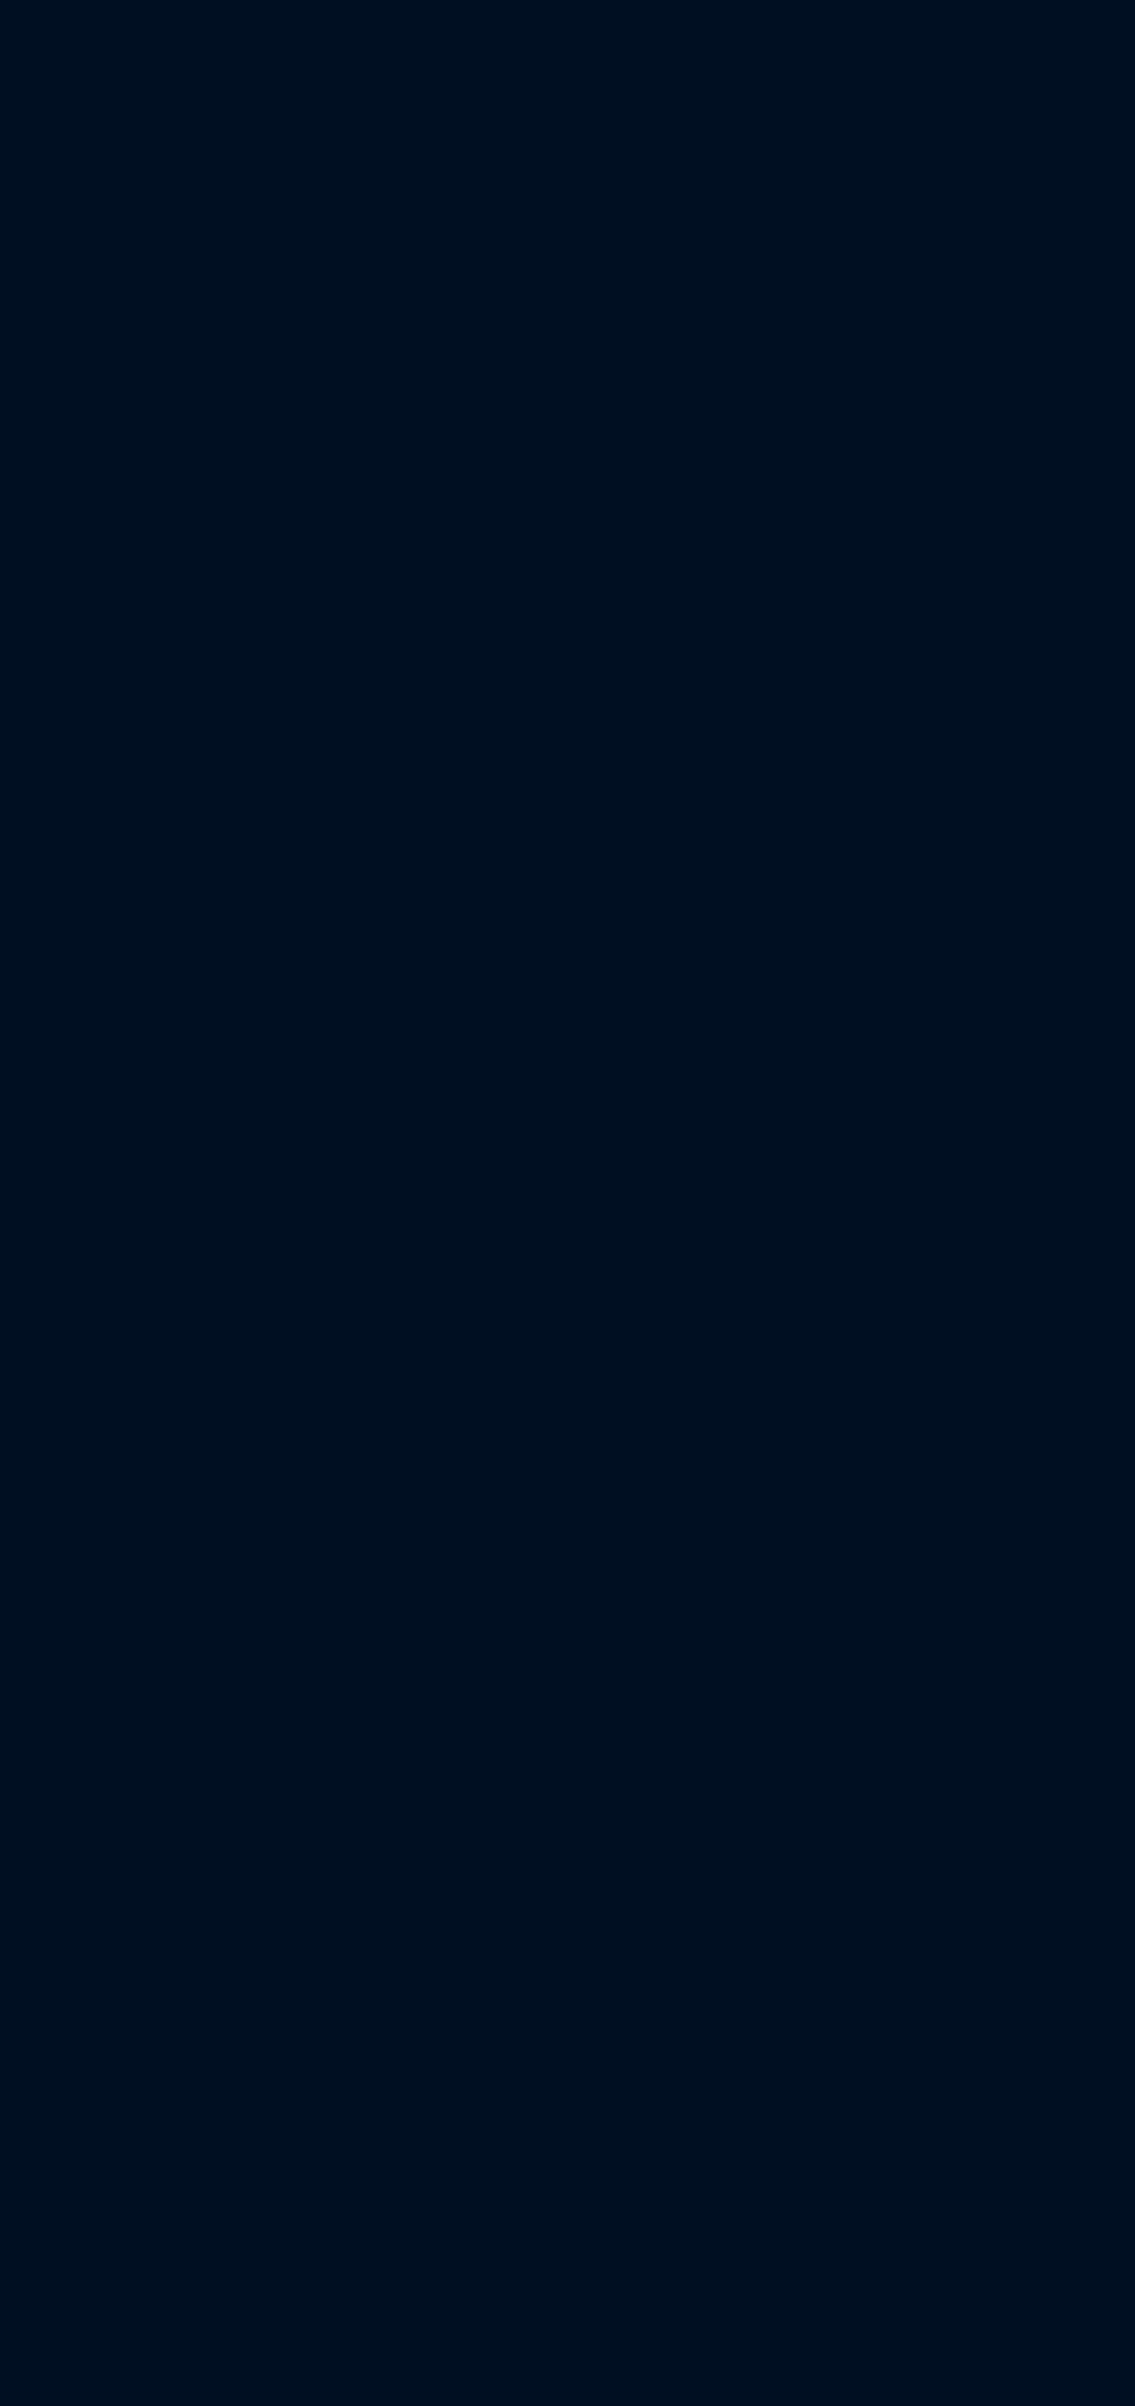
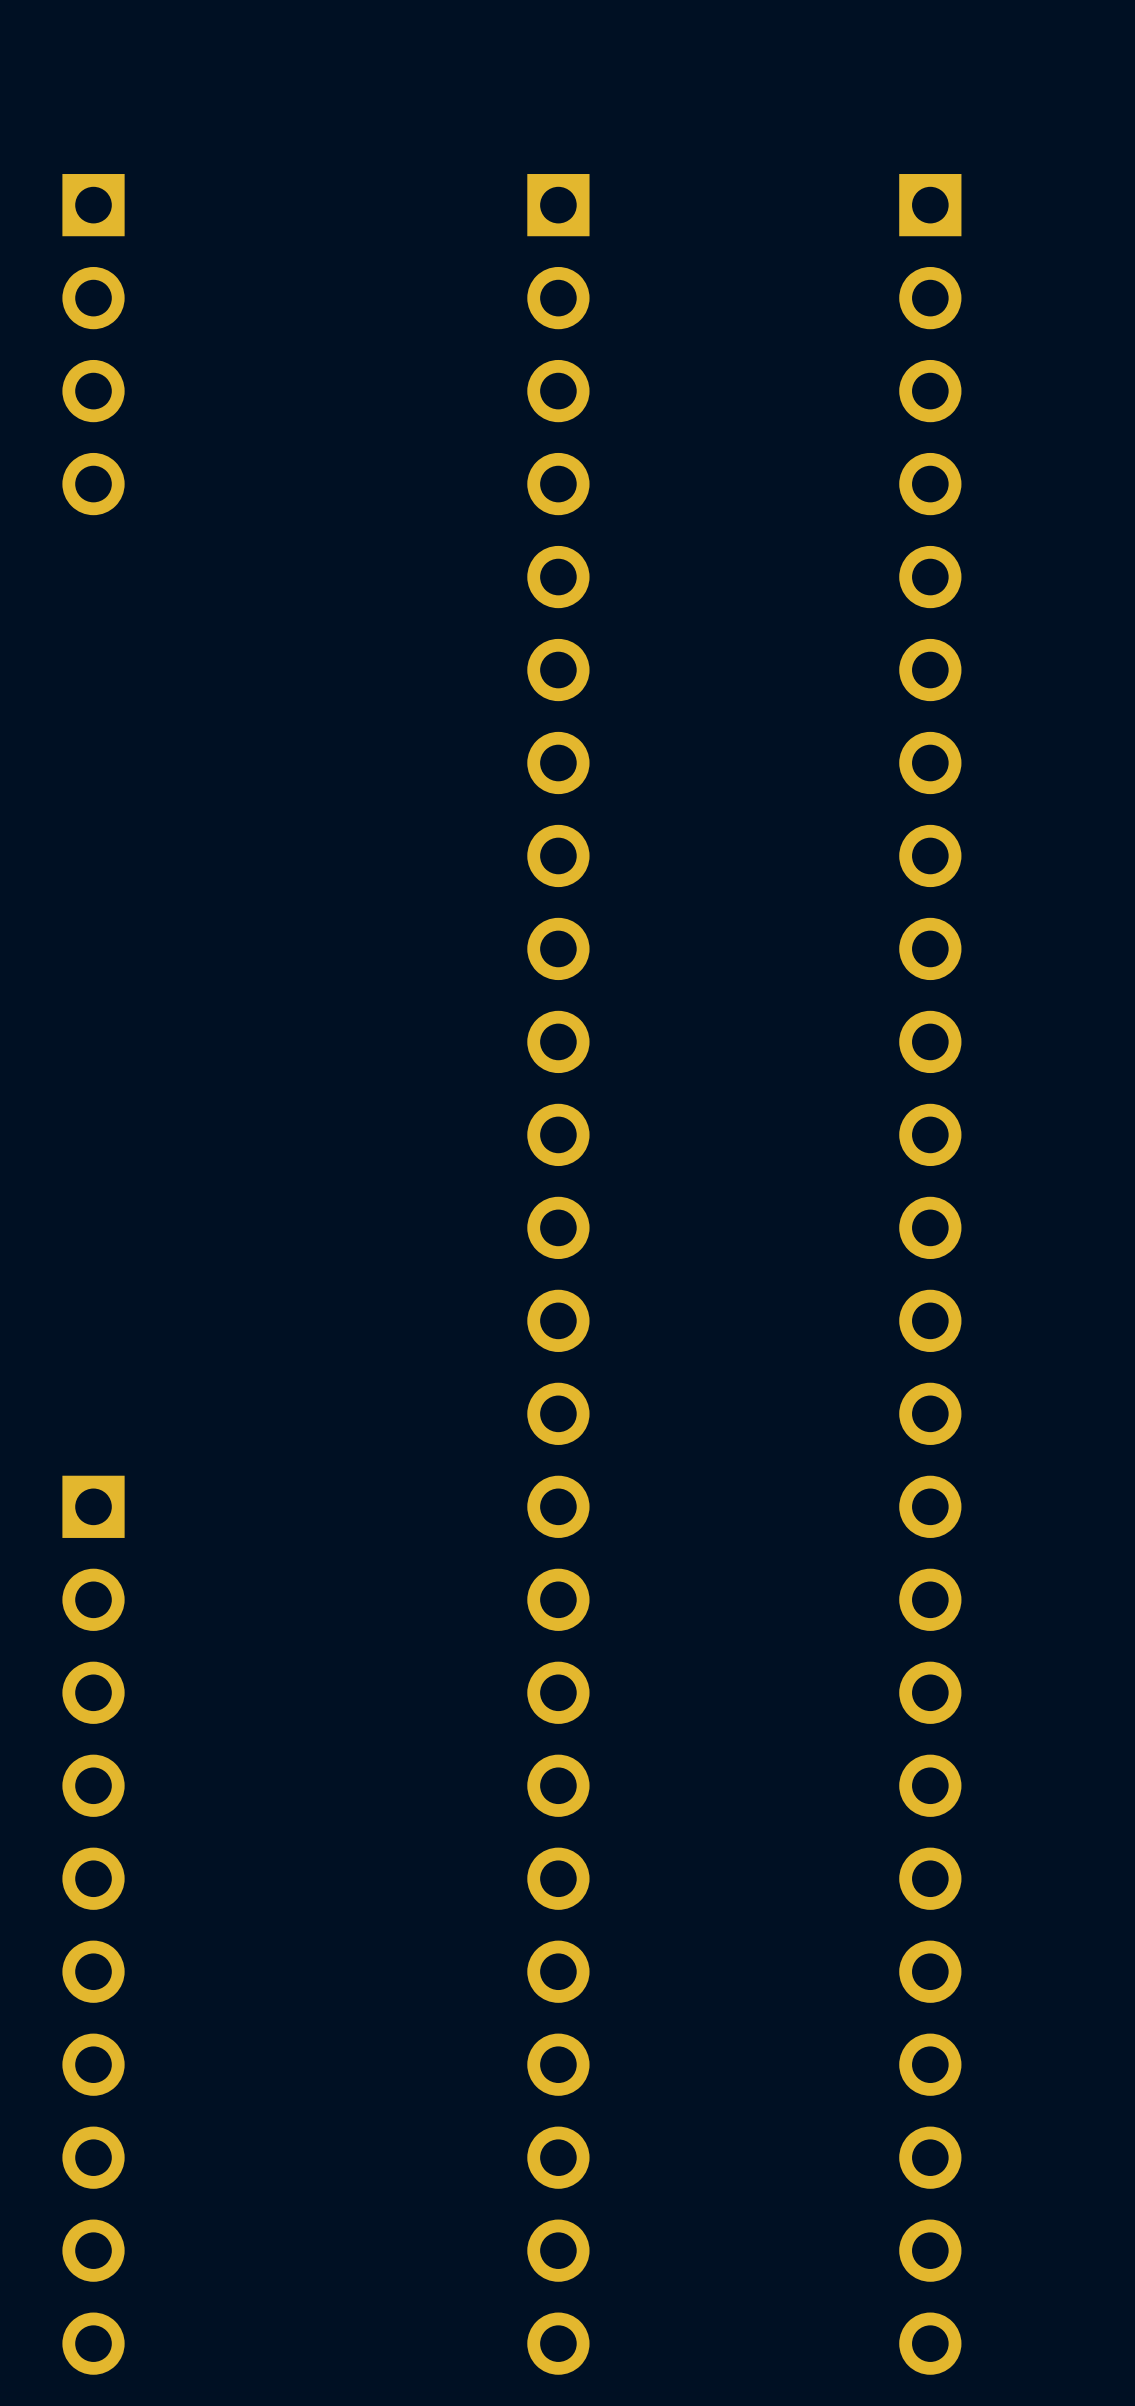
part: none -> (93, 344)
part: none -> (558, 1274)
part: none -> (930, 1274)
part: none -> (93, 1925)

